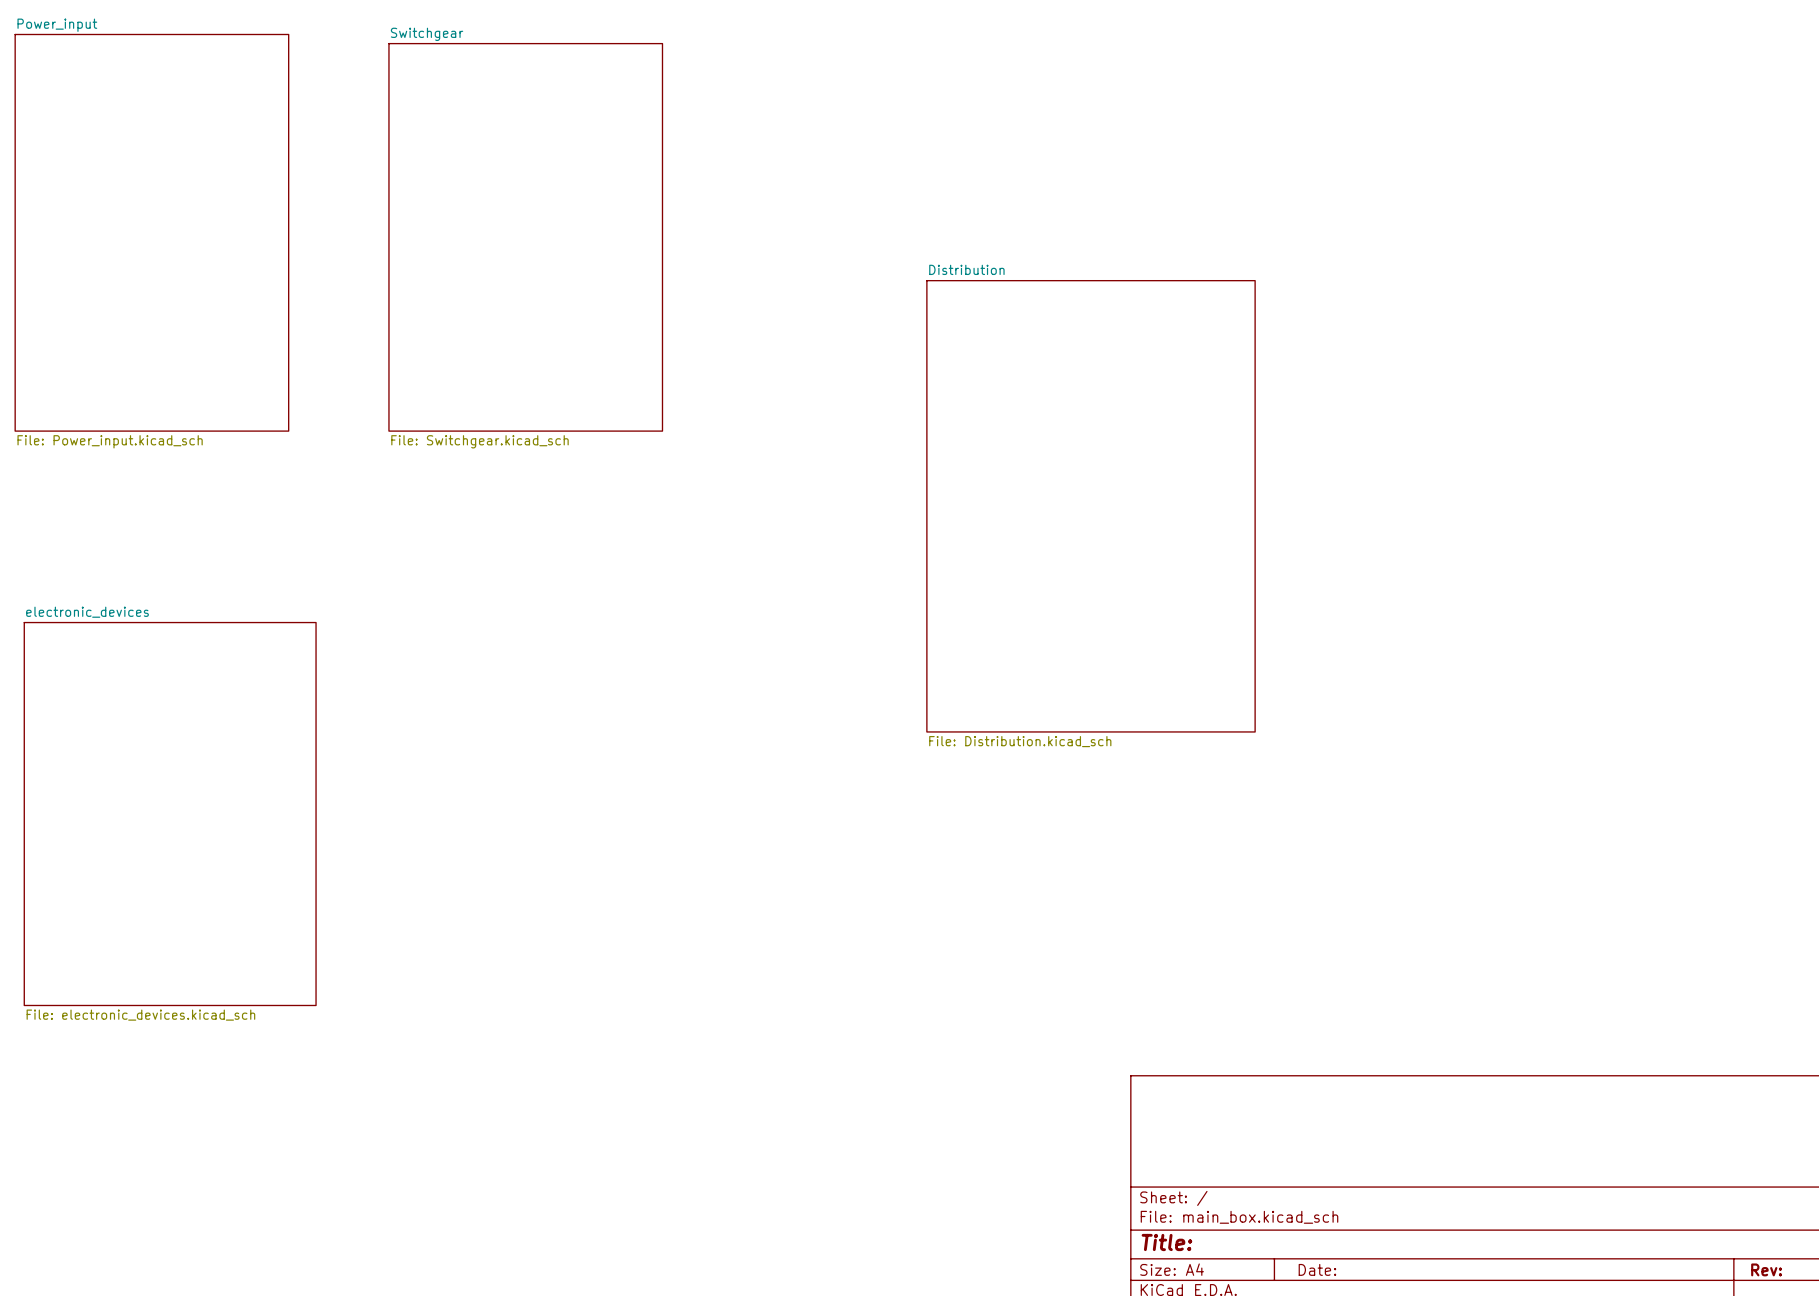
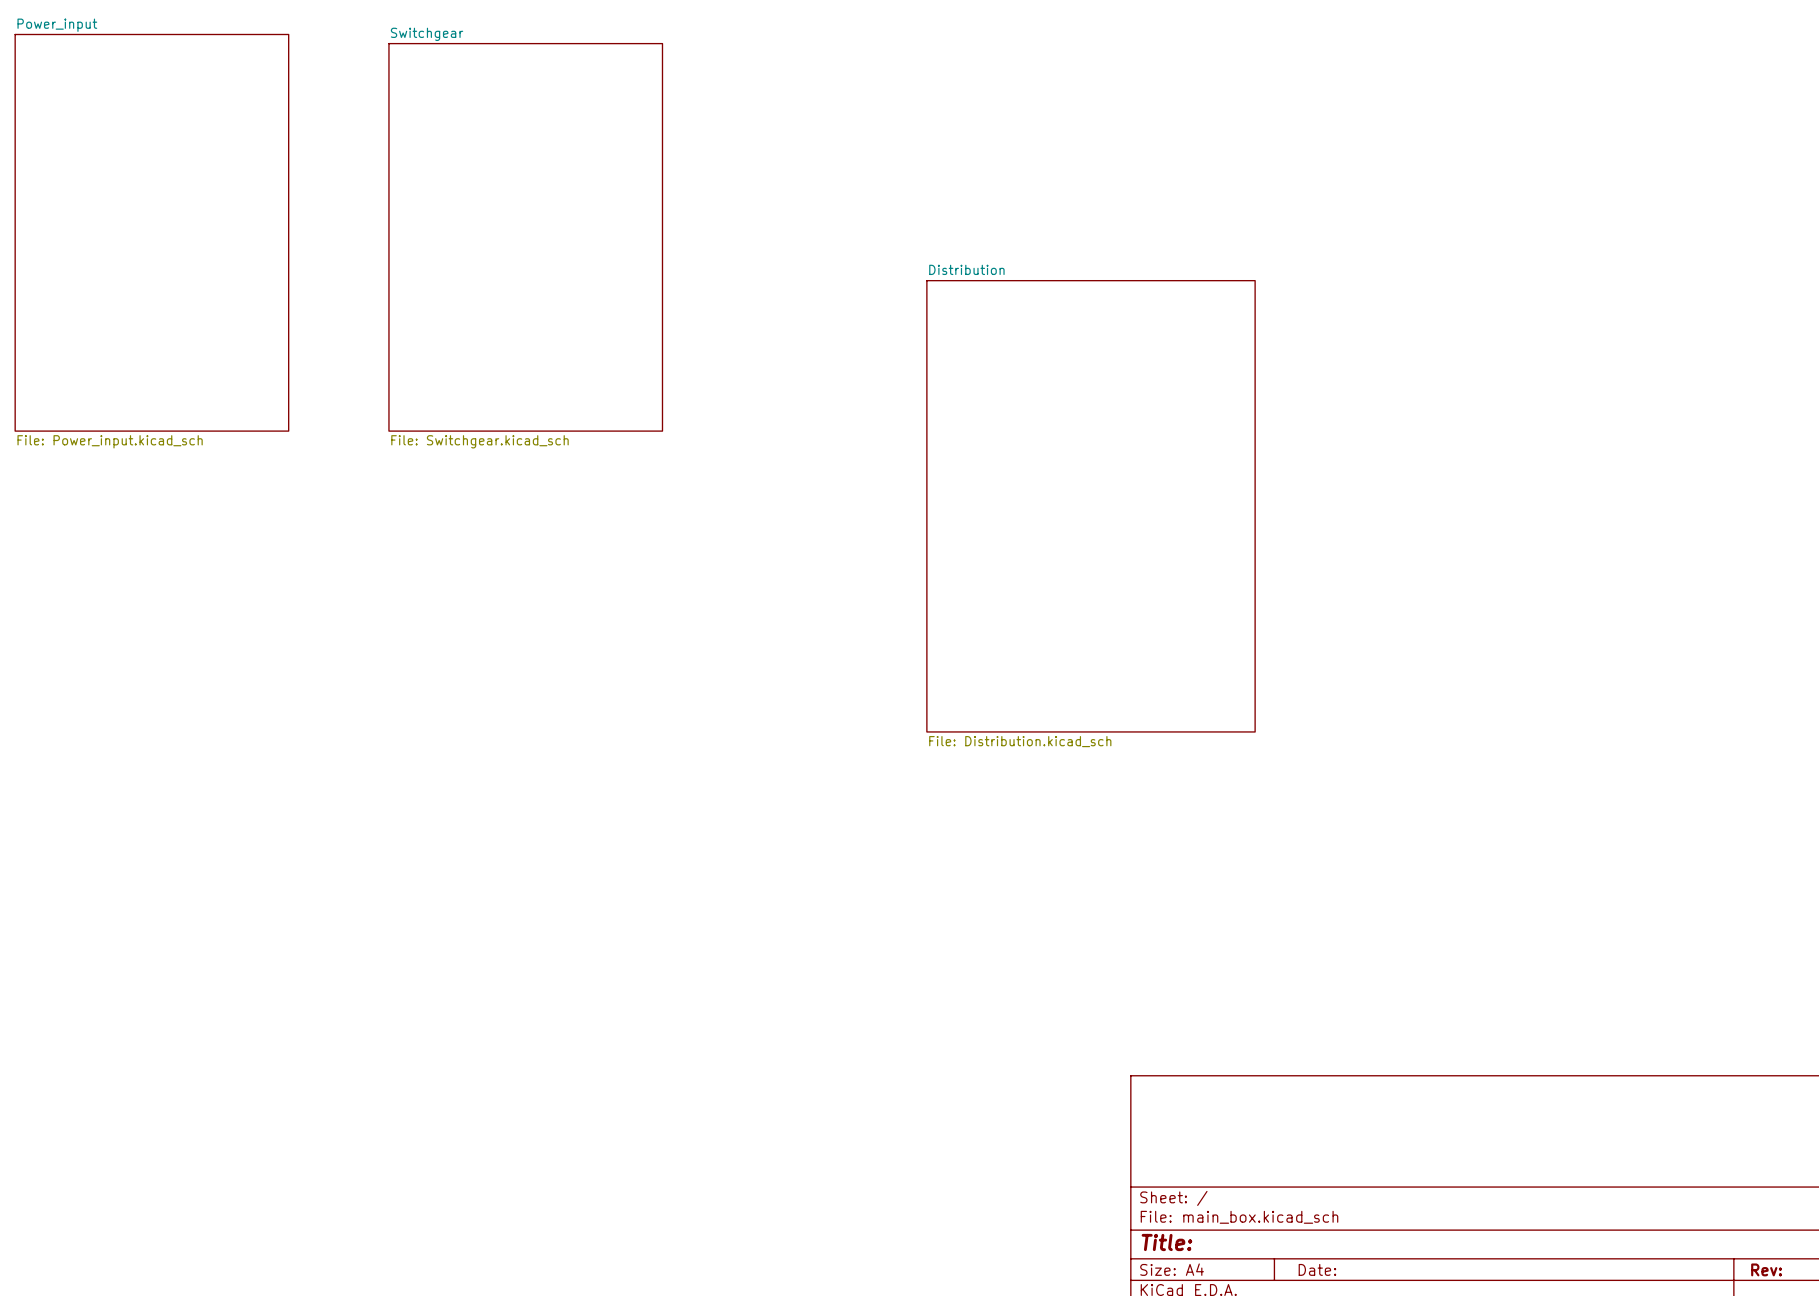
sheet electronic_devices: File: electronic_devices.kicad_sch (170, 814) -> none

